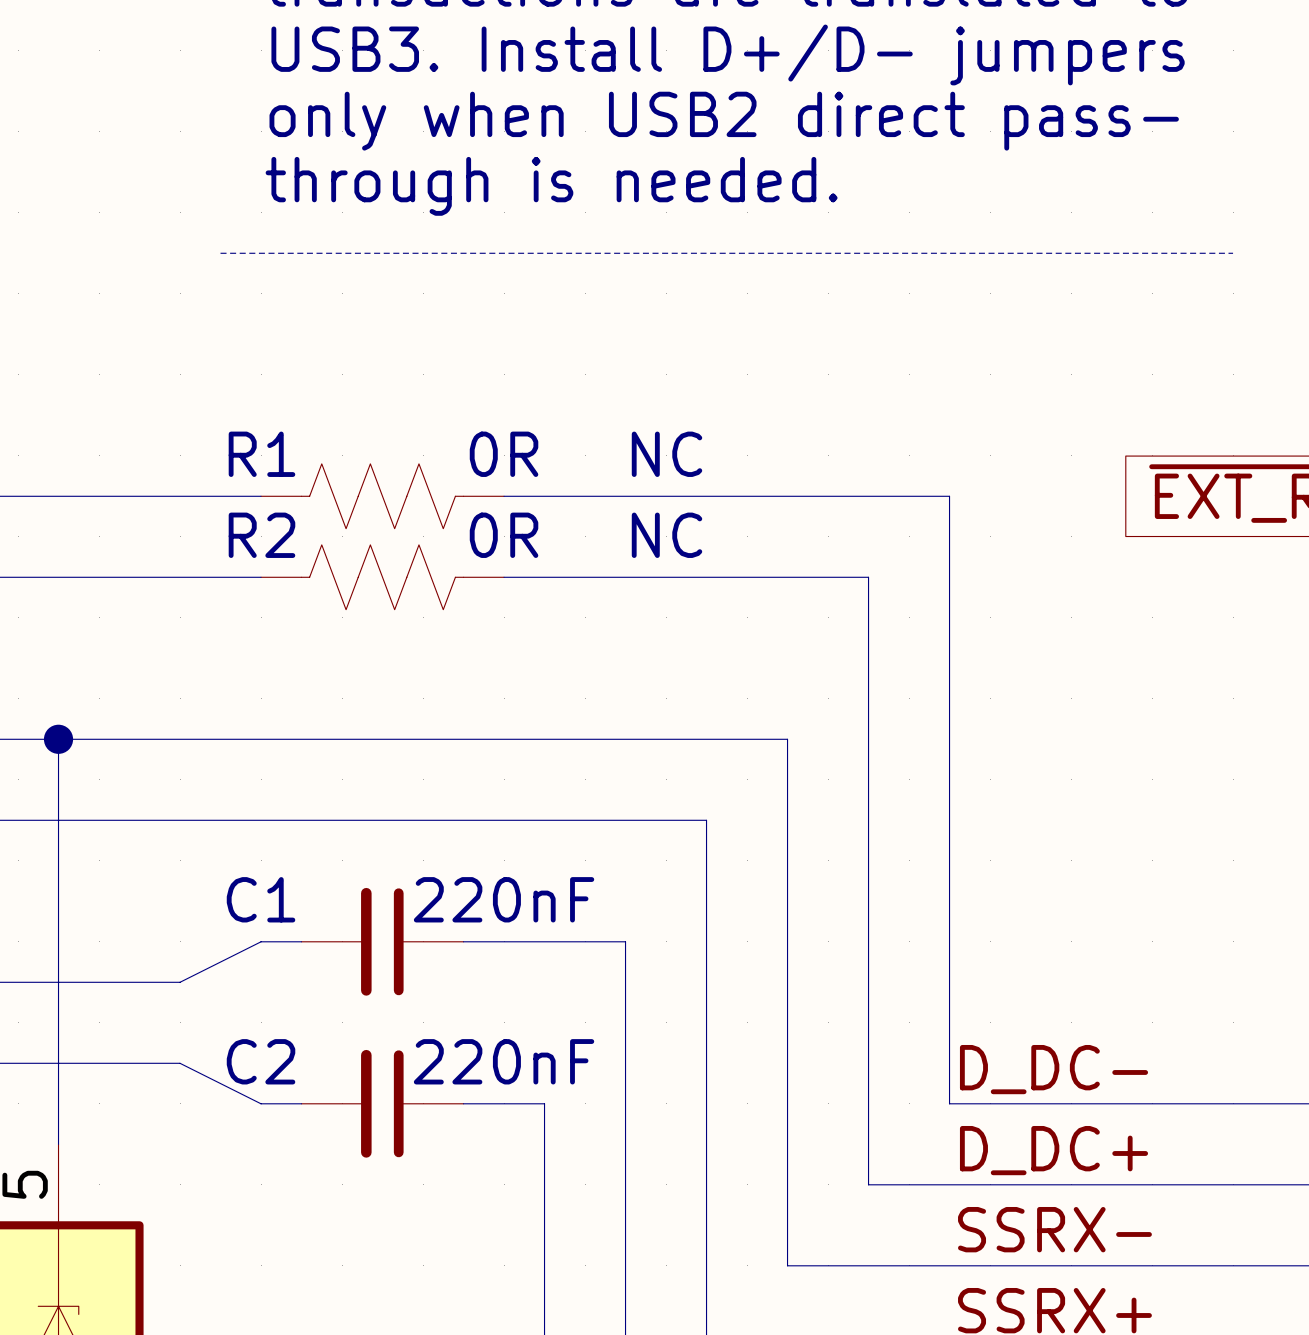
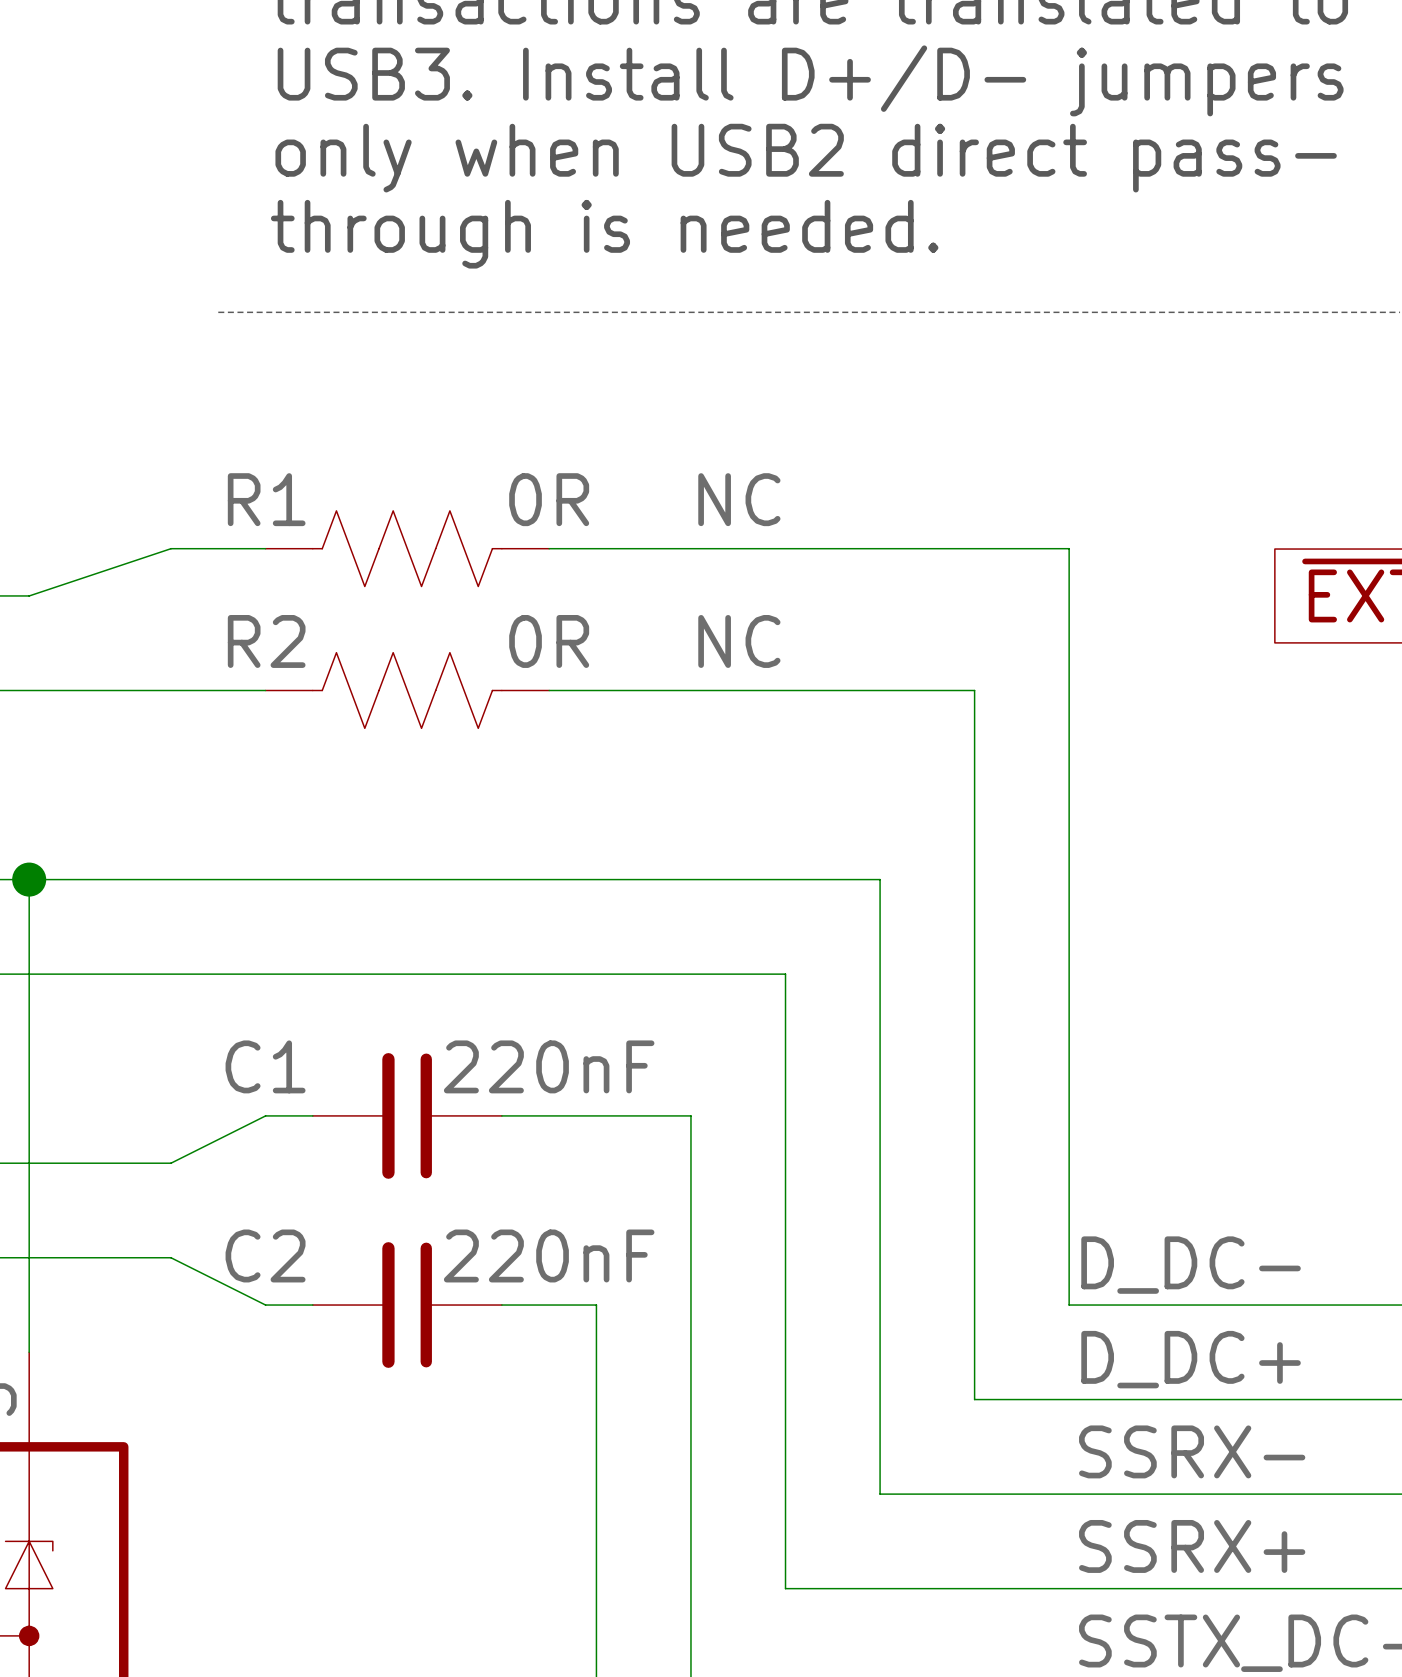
wire: (58, 496) (261, 496) -> (29, 595) (171, 548) (265, 548)
R1 position: (382, 496) -> (407, 548)
wire: (504, 496) (949, 496) -> (549, 548) (1069, 548) (1069, 595)

